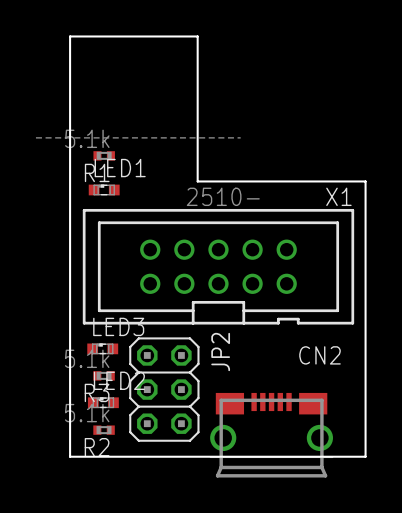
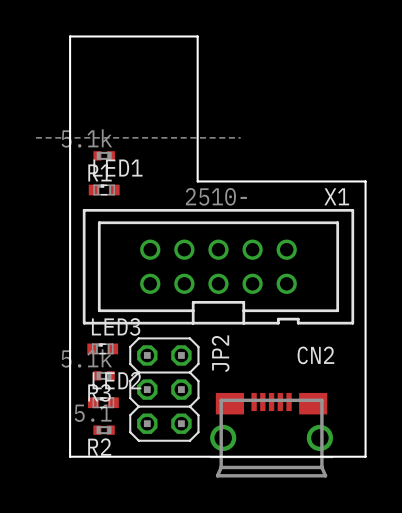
R2 value: 5.1k (87, 413) -> 5.1 (93, 413)

